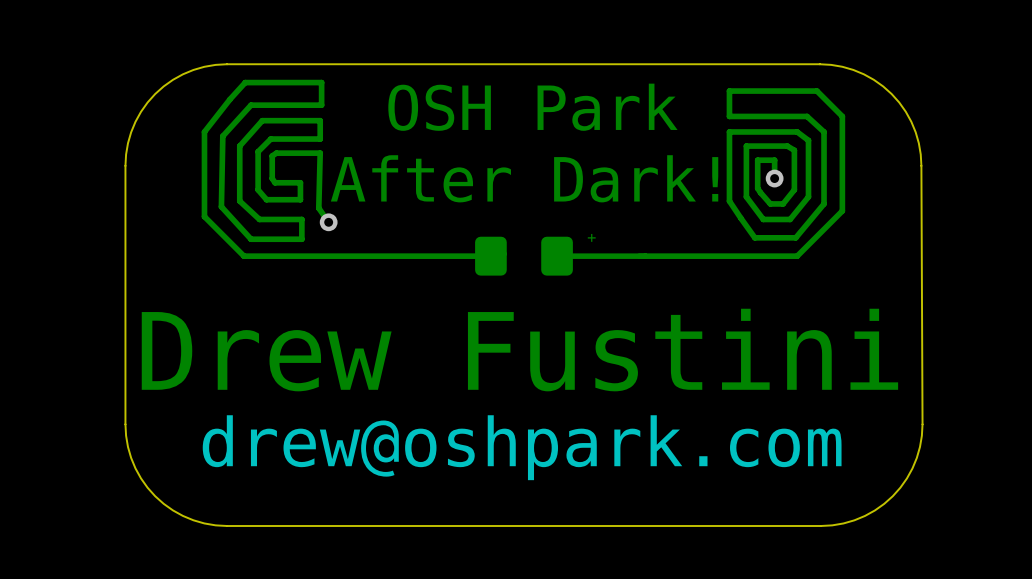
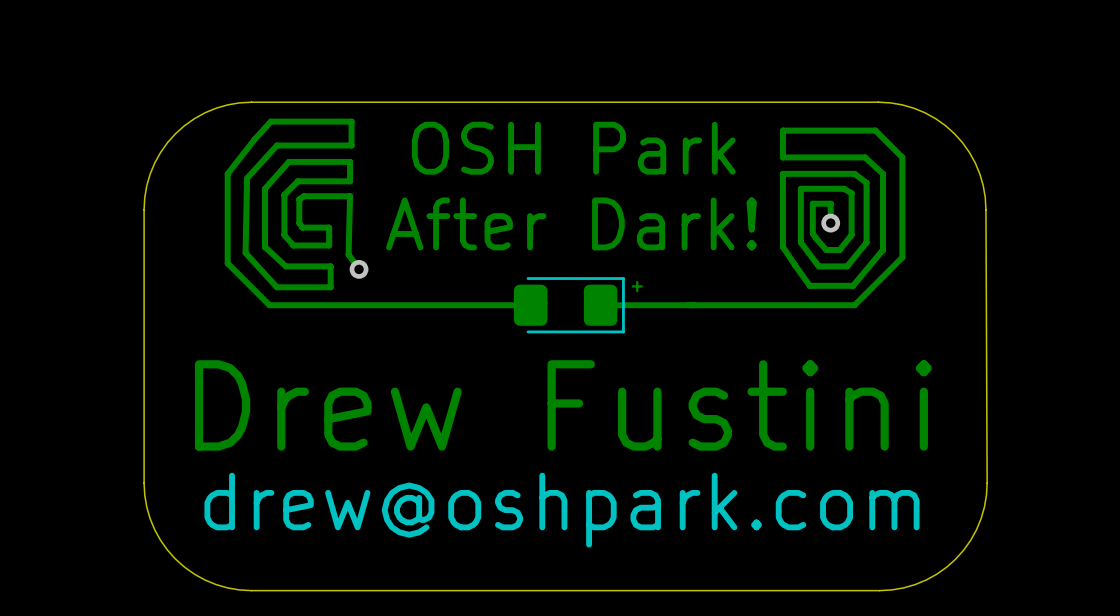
part footprint: [475, 236, 573, 276] -> [513, 277, 625, 334]

